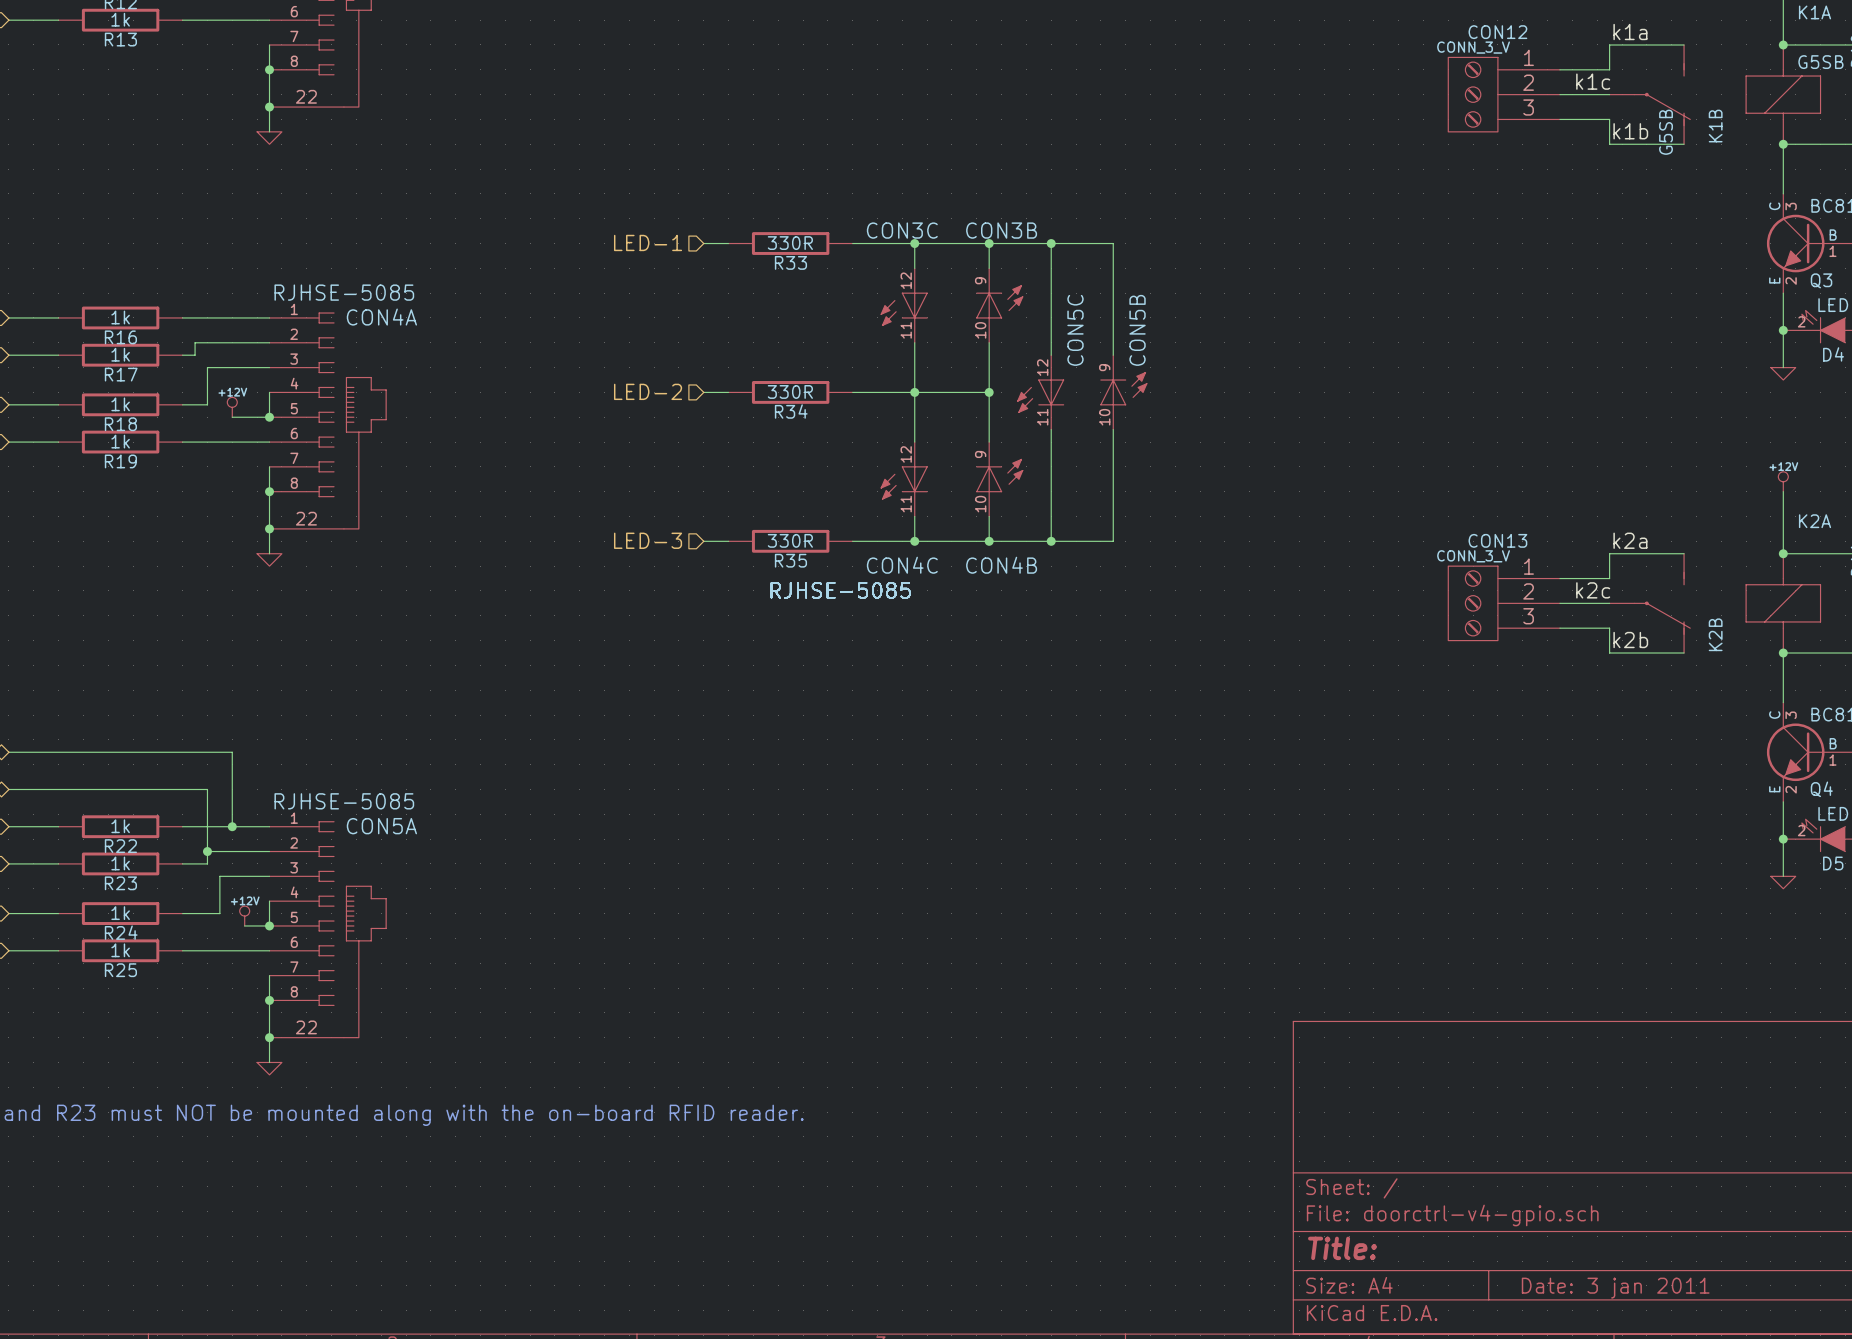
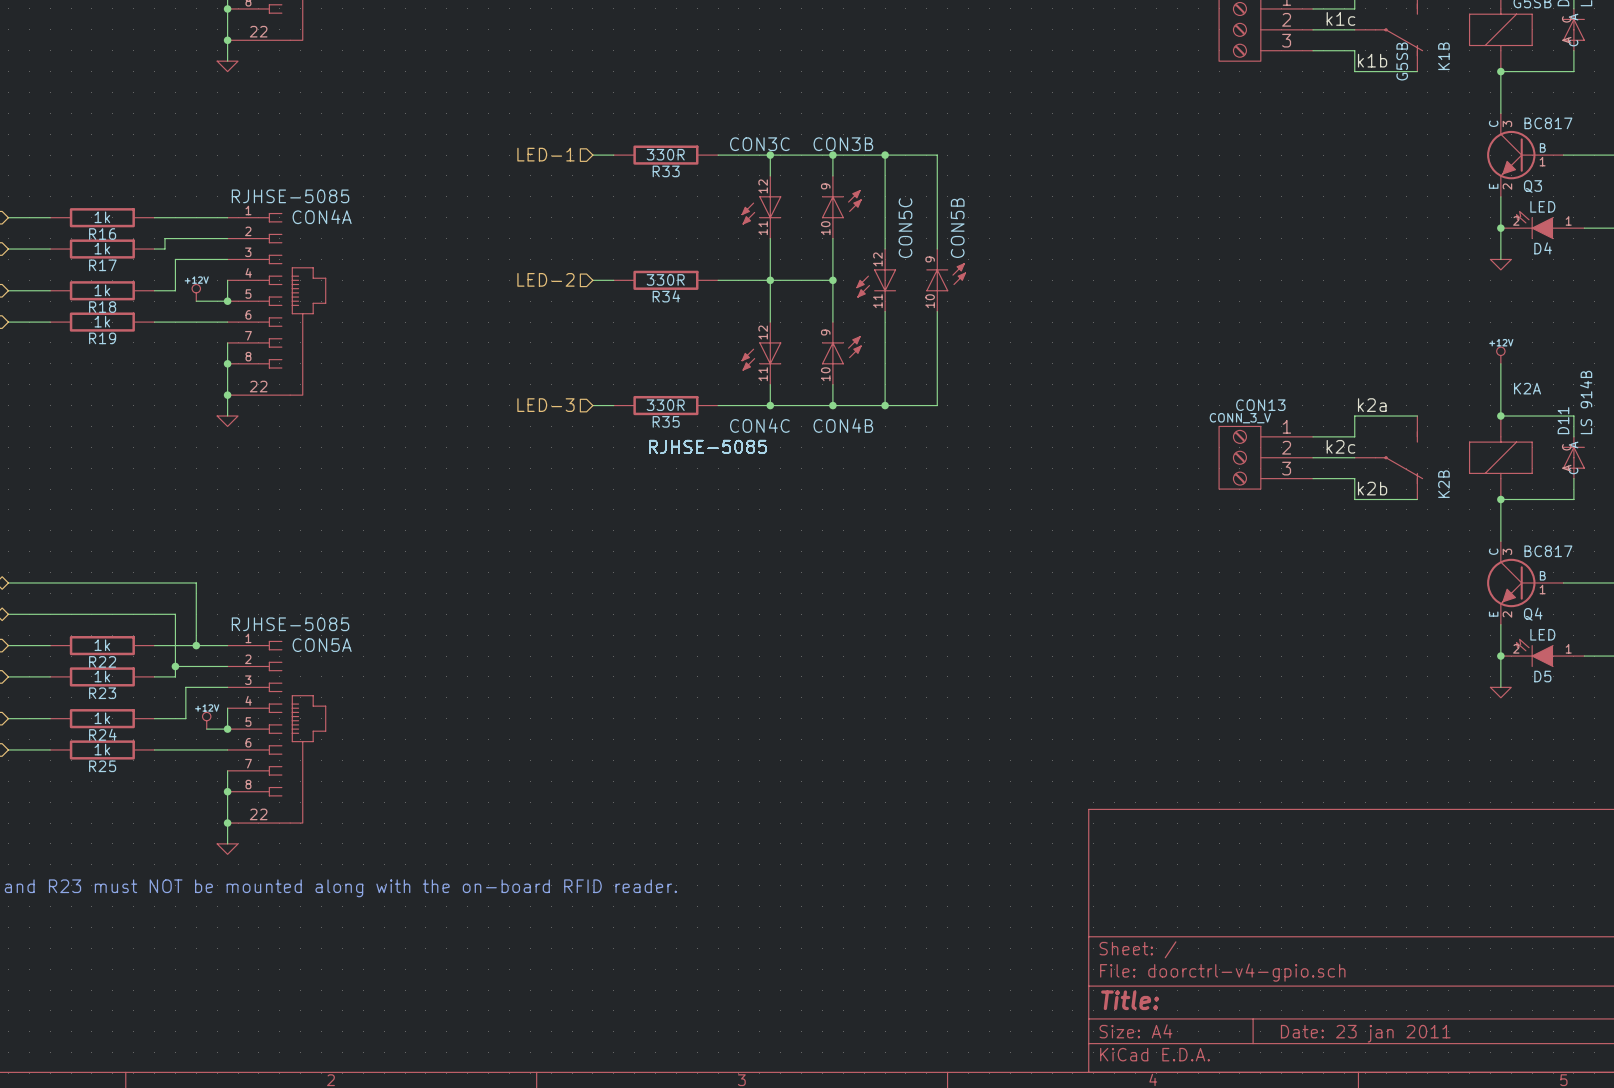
title block: Date: 3 jan 2011 (1615, 1288) -> Date: 23 jan 2011 (1365, 1033)

